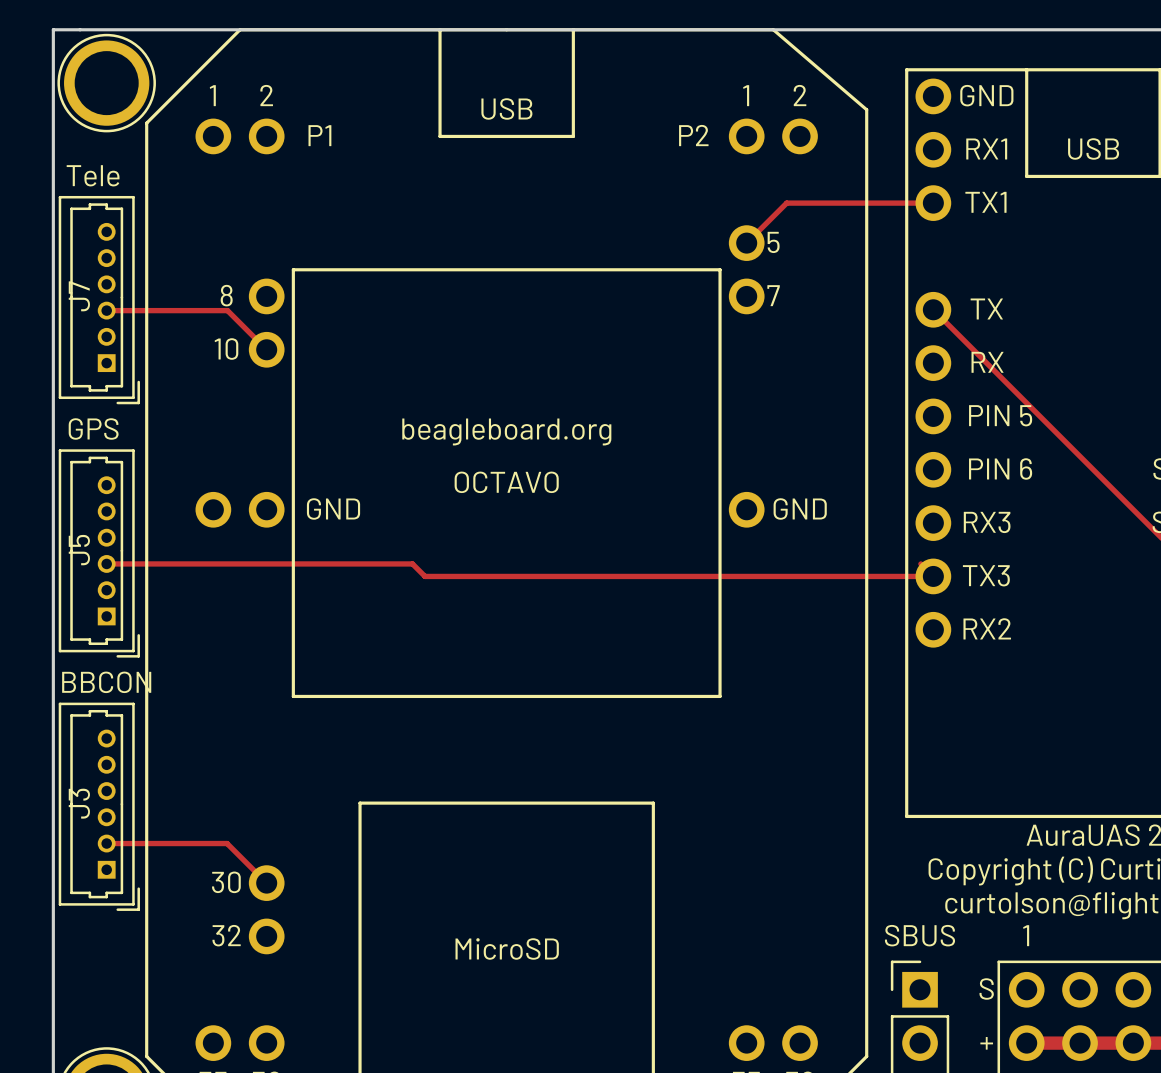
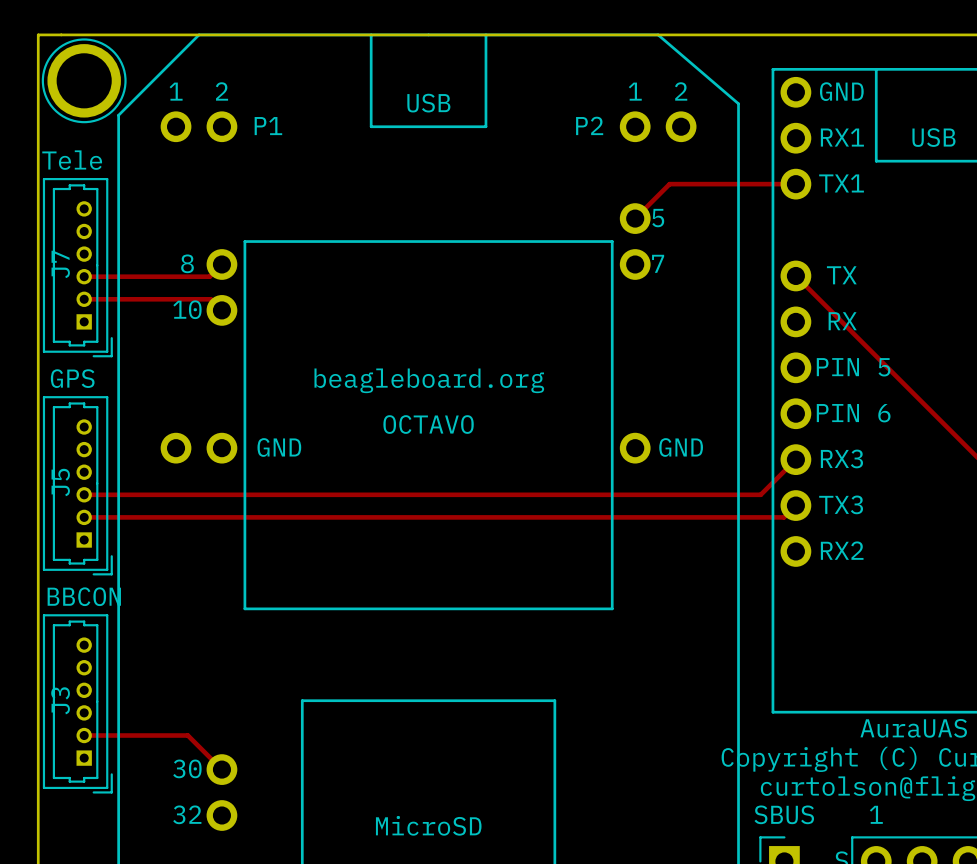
track: (227, 310) (253, 336) -> (188, 276) (209, 276) (221, 264)
track: none -> (84, 299) (210, 299)
track: (412, 563) (425, 576) (933, 576) (920, 563) -> (347, 494) (760, 494) (795, 459)
track: none -> (795, 505) (784, 517) (84, 517)

